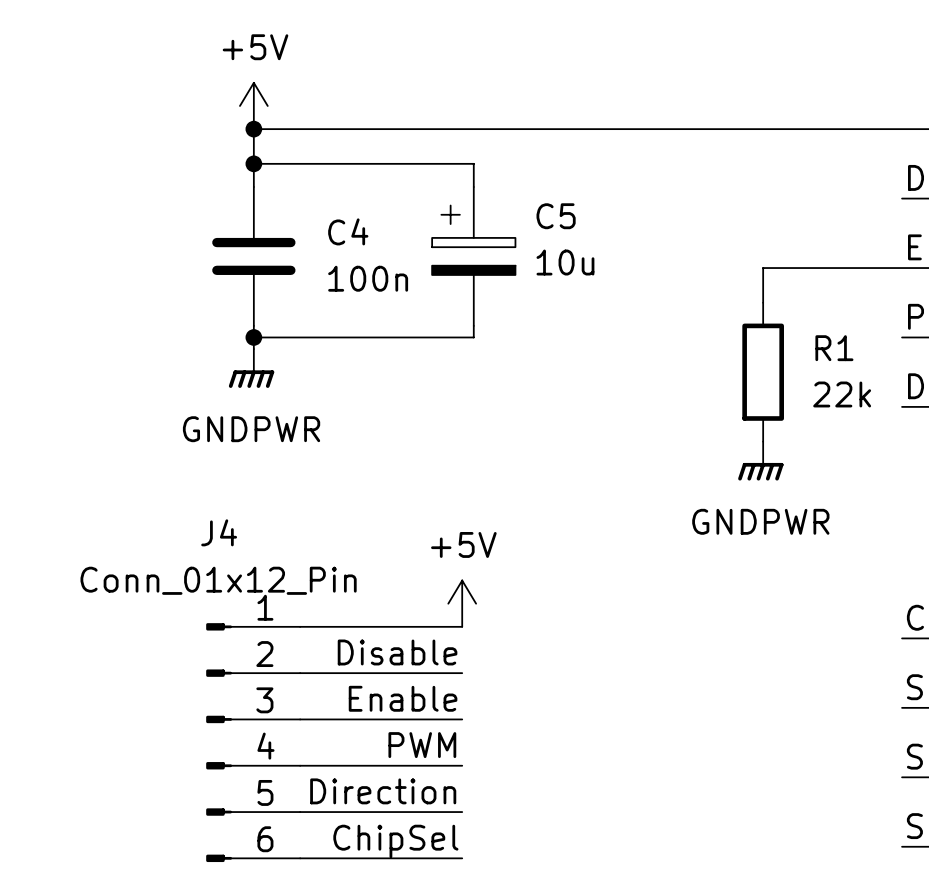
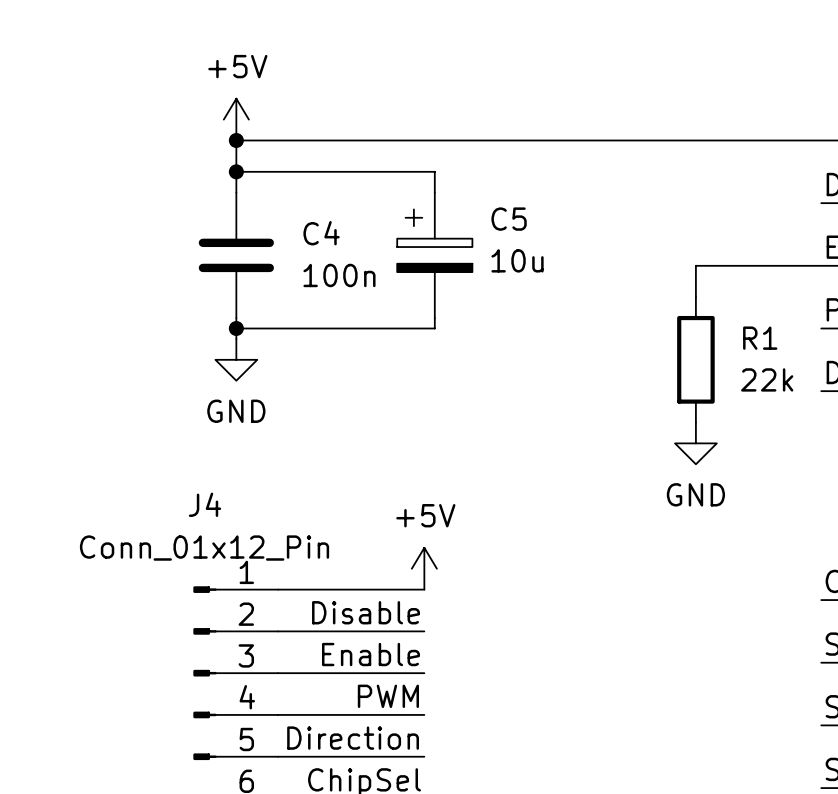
power symbol: GNDPWR (251, 368) -> GND (236, 359)
power symbol: GNDPWR (760, 461) -> GND (695, 443)

